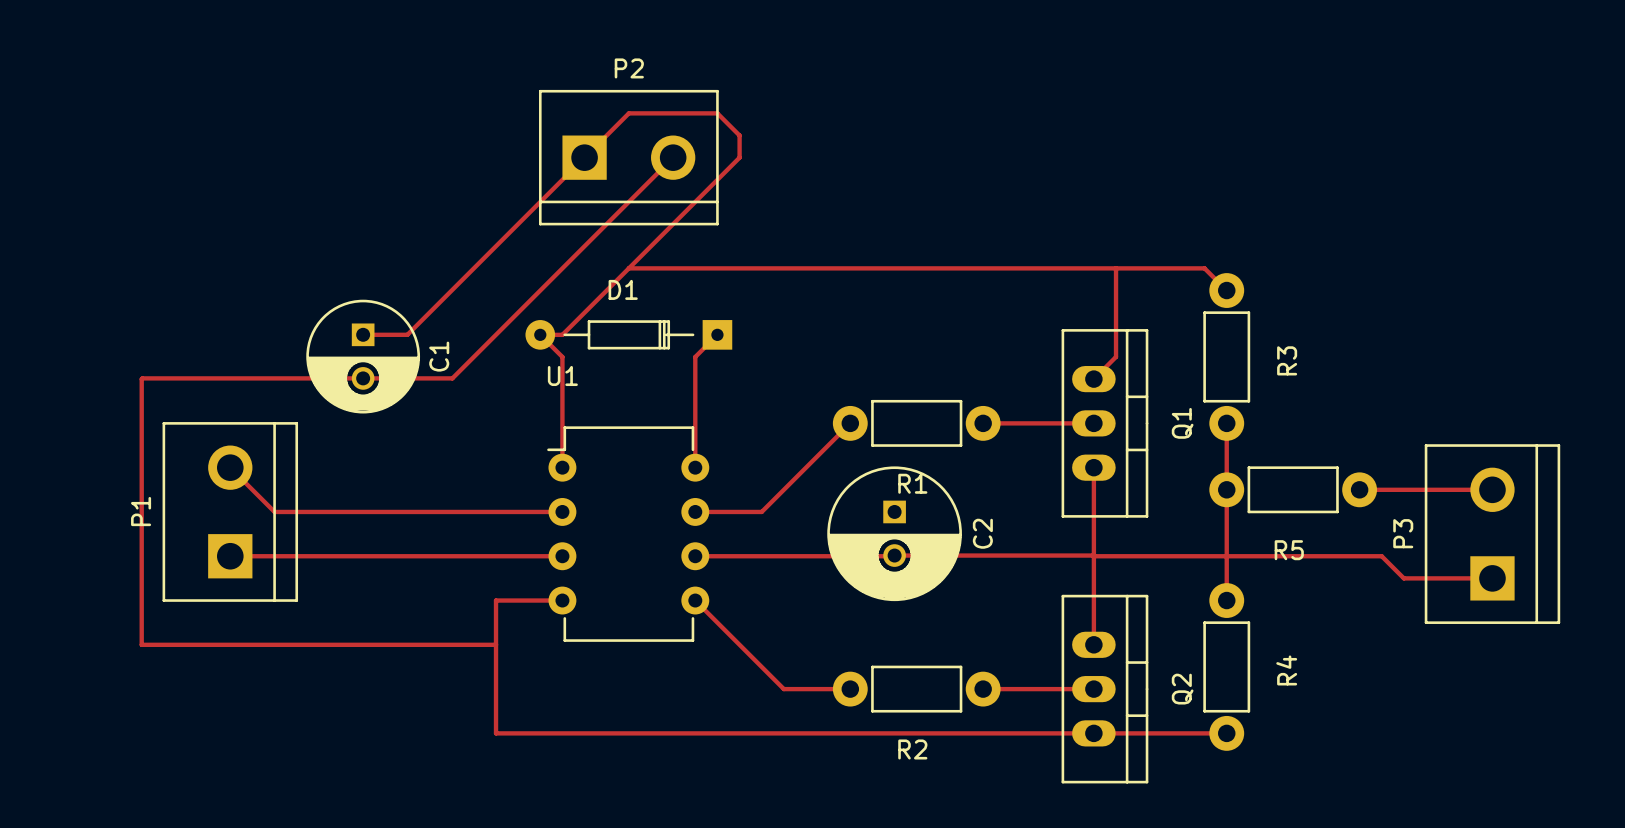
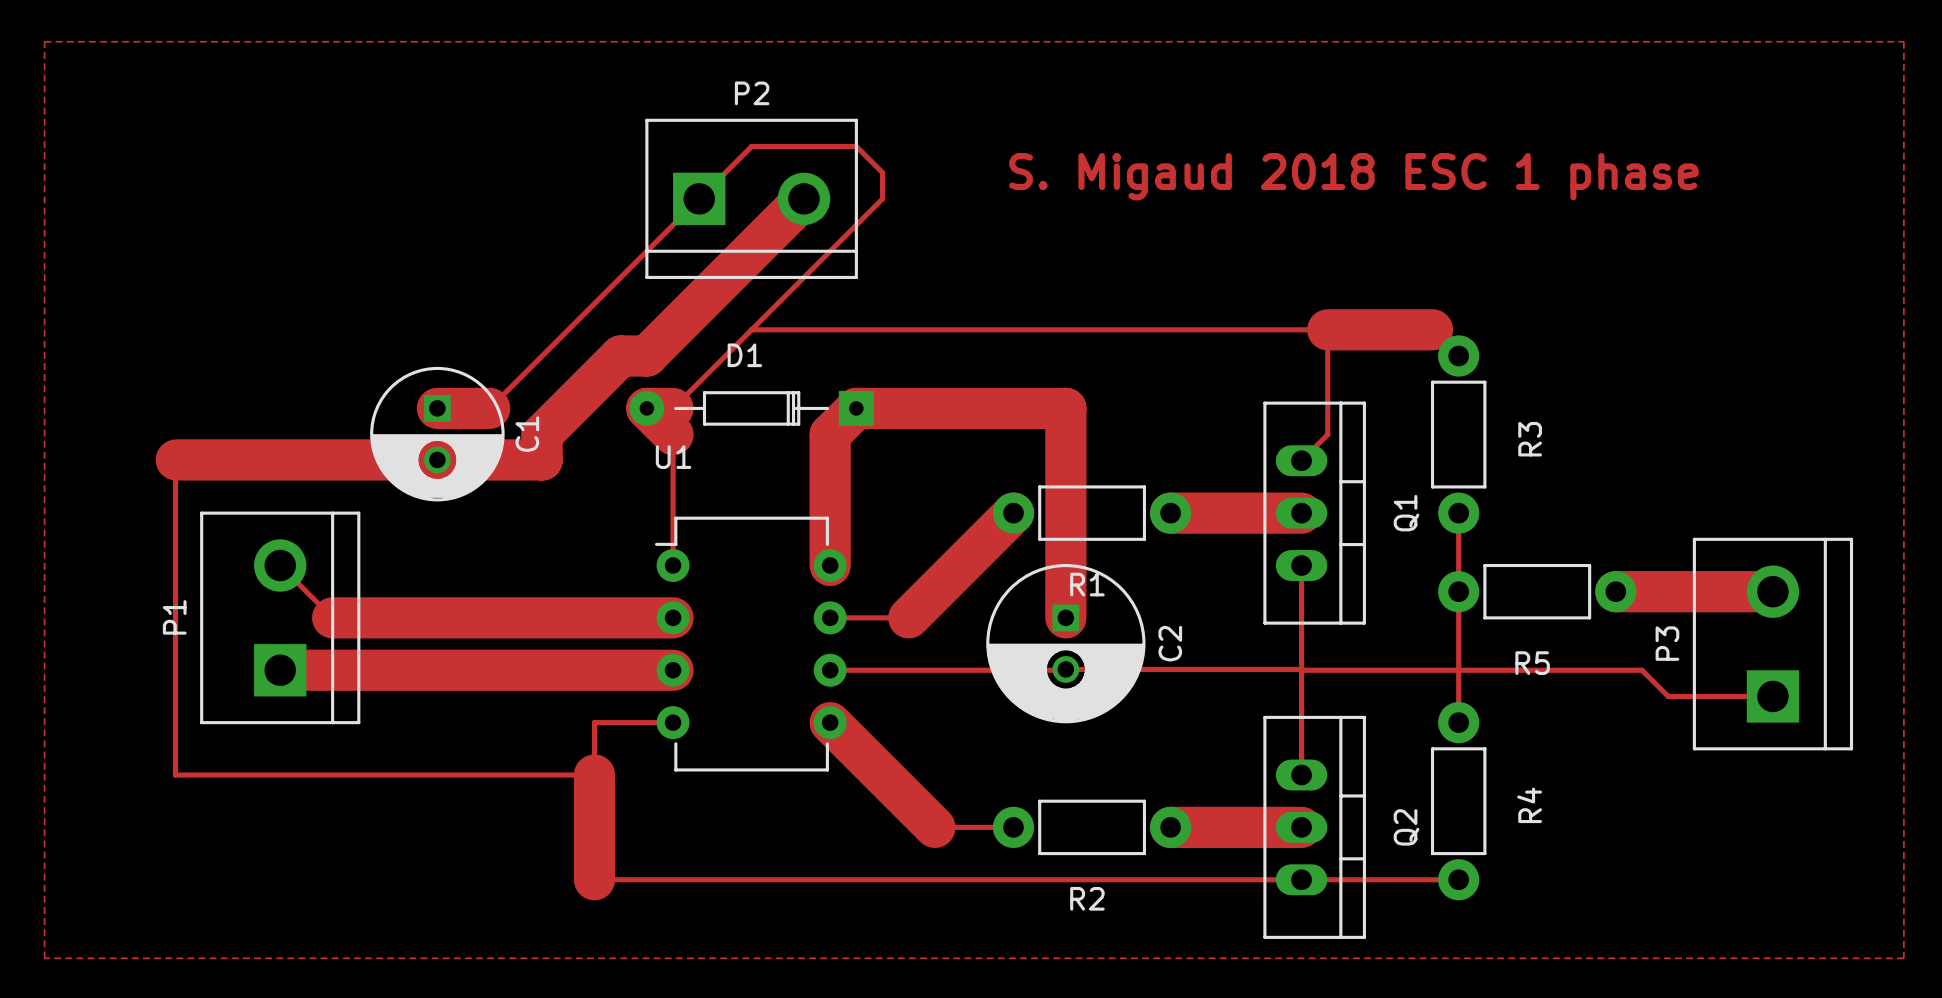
zone outline: none -> (44, 41) (44, 958) (1903, 958) (1903, 41) (44, 41)
text: none -> S. Migaud 2018 ESC 1 phase (1353, 176)
track width: thin (673, 157) (540, 290) -> thick (804, 198) (646, 356)
track width: thin (1116, 268) (1204, 268) -> thick (1327, 329) (1432, 329)
track: (540, 290) (451, 378) -> (646, 356) (620, 356) (542, 434) (542, 459)
track width: thin (363, 334) (407, 334) -> thick (437, 408) (489, 408)
track width: thin (562, 334) (540, 334) (562, 357) -> thick (673, 408) (646, 408) (673, 434)
track: none -> (830, 434) (856, 408) (1065, 408) (1065, 617)
track width: thin (695, 356) (695, 467) -> thick (830, 434) (830, 565)
track width: thin (142, 378) (451, 378) -> thick (176, 459) (542, 459)
track width: thin (850, 423) (761, 511) -> thick (1013, 513) (908, 617)
track width: thin (983, 423) (1093, 423) -> thick (1170, 513) (1301, 513)
track width: thin (1359, 489) (1492, 489) -> thick (1615, 591) (1772, 591)
track width: thin (274, 511) (562, 511) -> thick (332, 617) (673, 617)
track width: thin (230, 556) (562, 556) -> thick (280, 670) (673, 670)
track width: thin (695, 600) (783, 689) -> thick (830, 722) (934, 827)
track width: thin (496, 644) (496, 733) -> thick (594, 775) (594, 879)
track width: thin (983, 689) (1093, 689) -> thick (1170, 827) (1301, 827)

